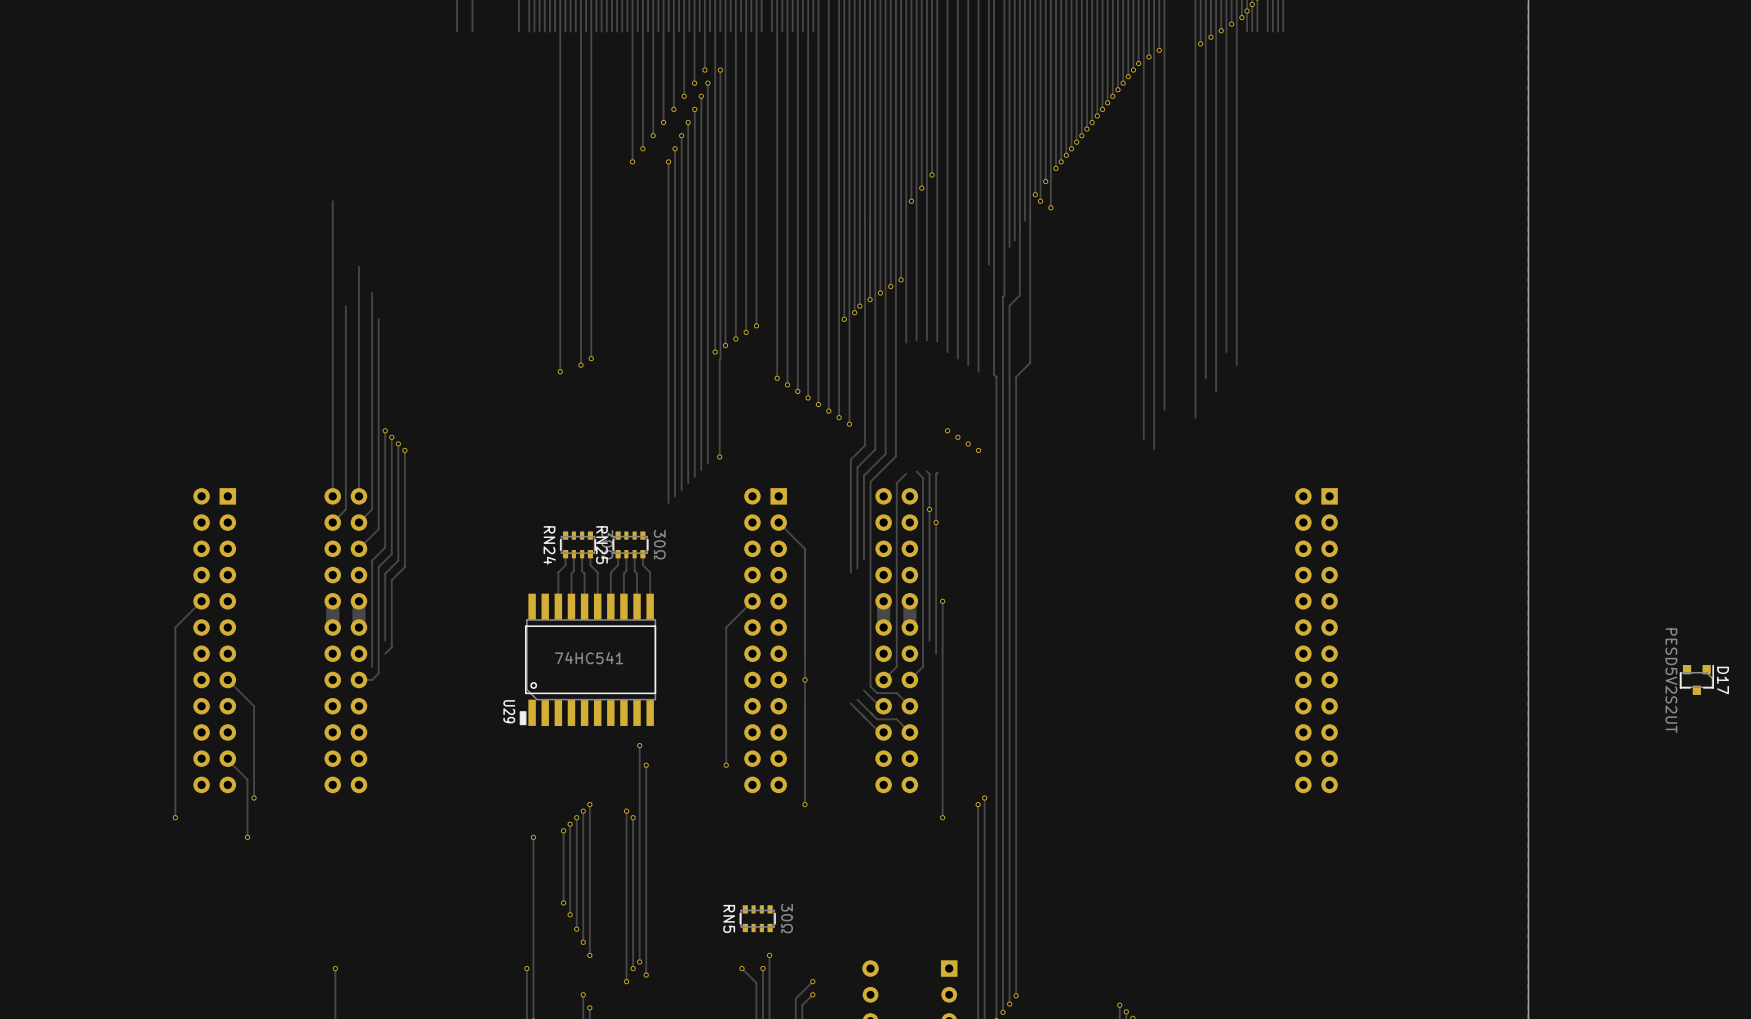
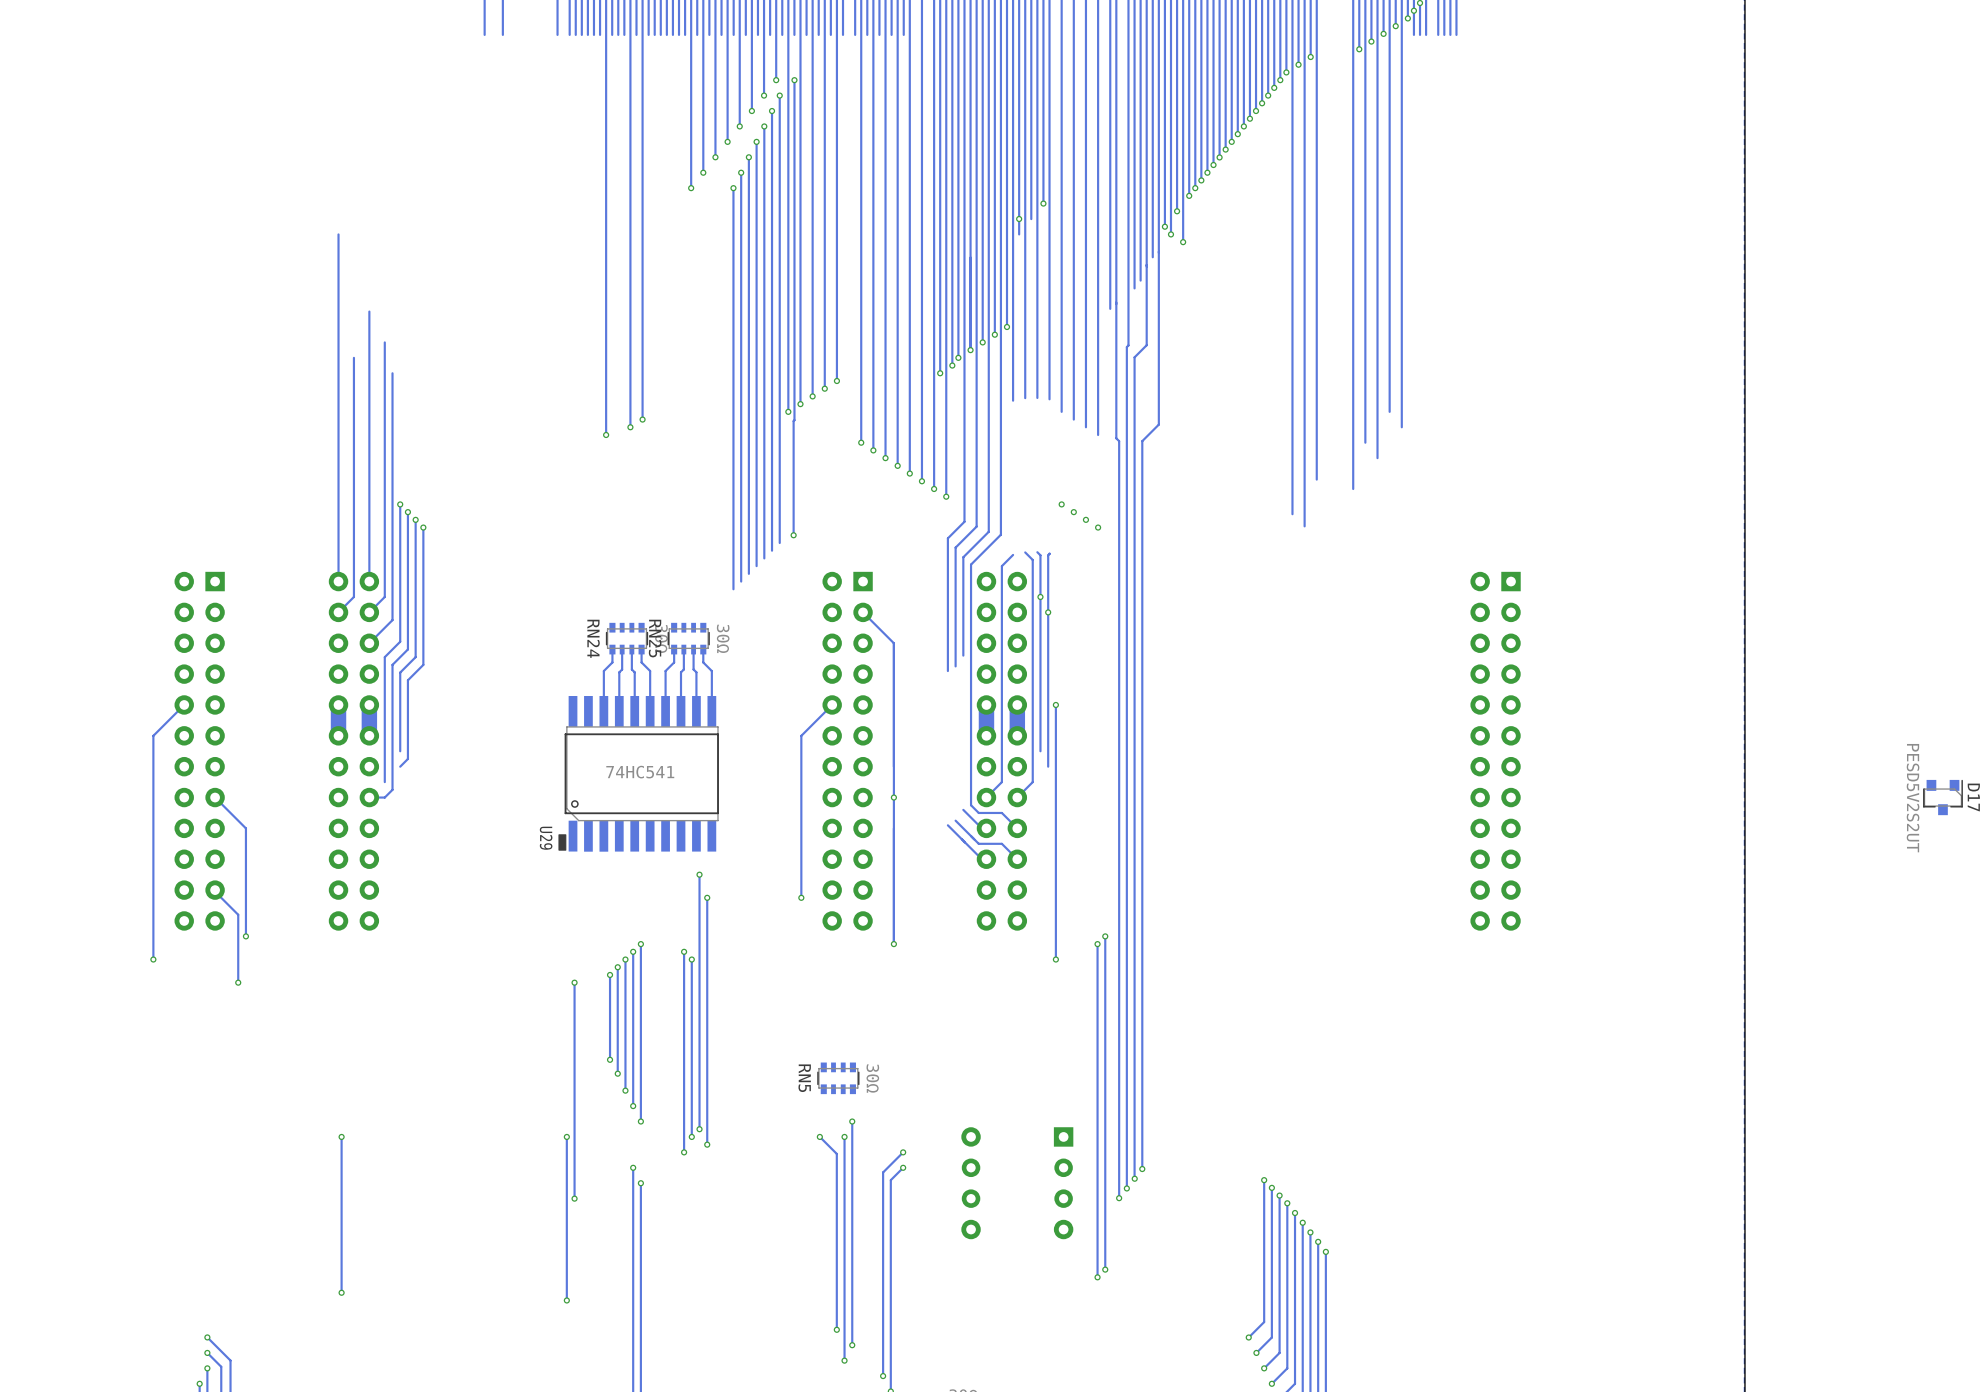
via: none -> (1019, 219)
via: (921, 188) -> none
via: (911, 201) -> none

